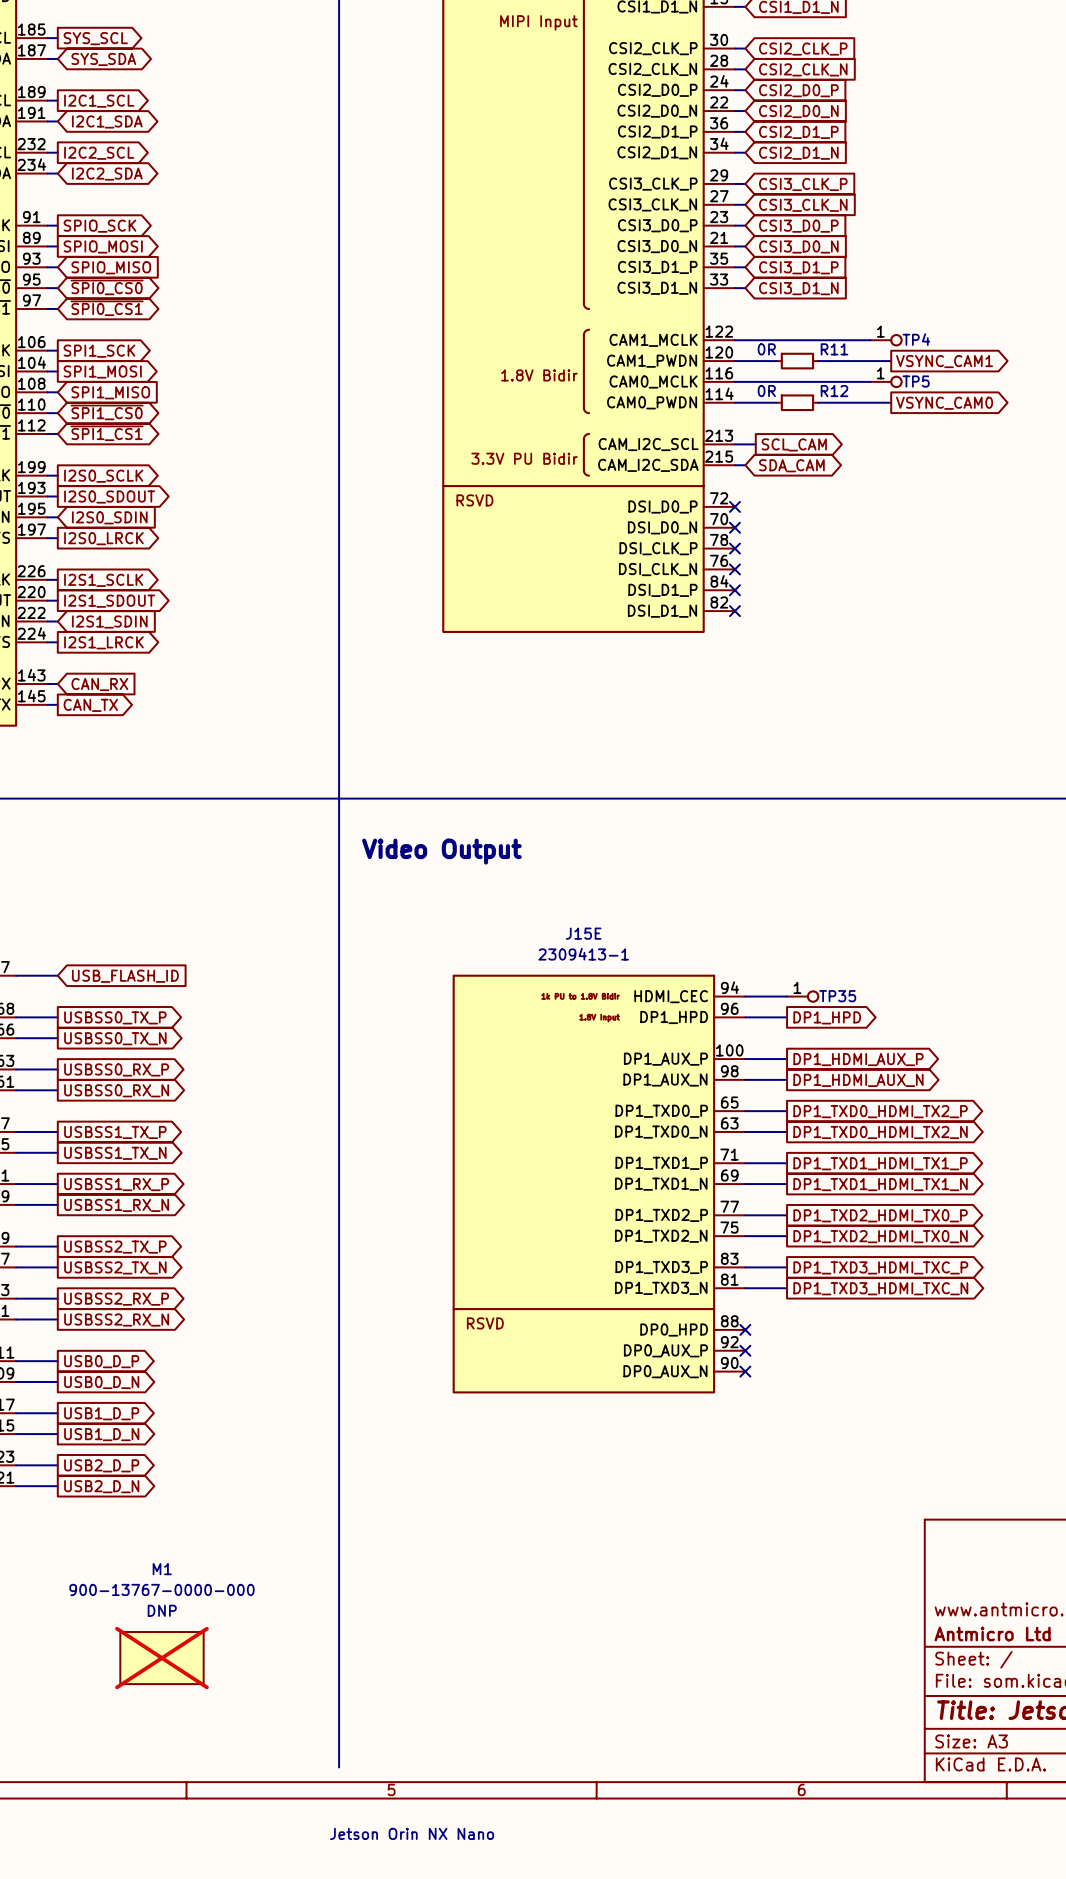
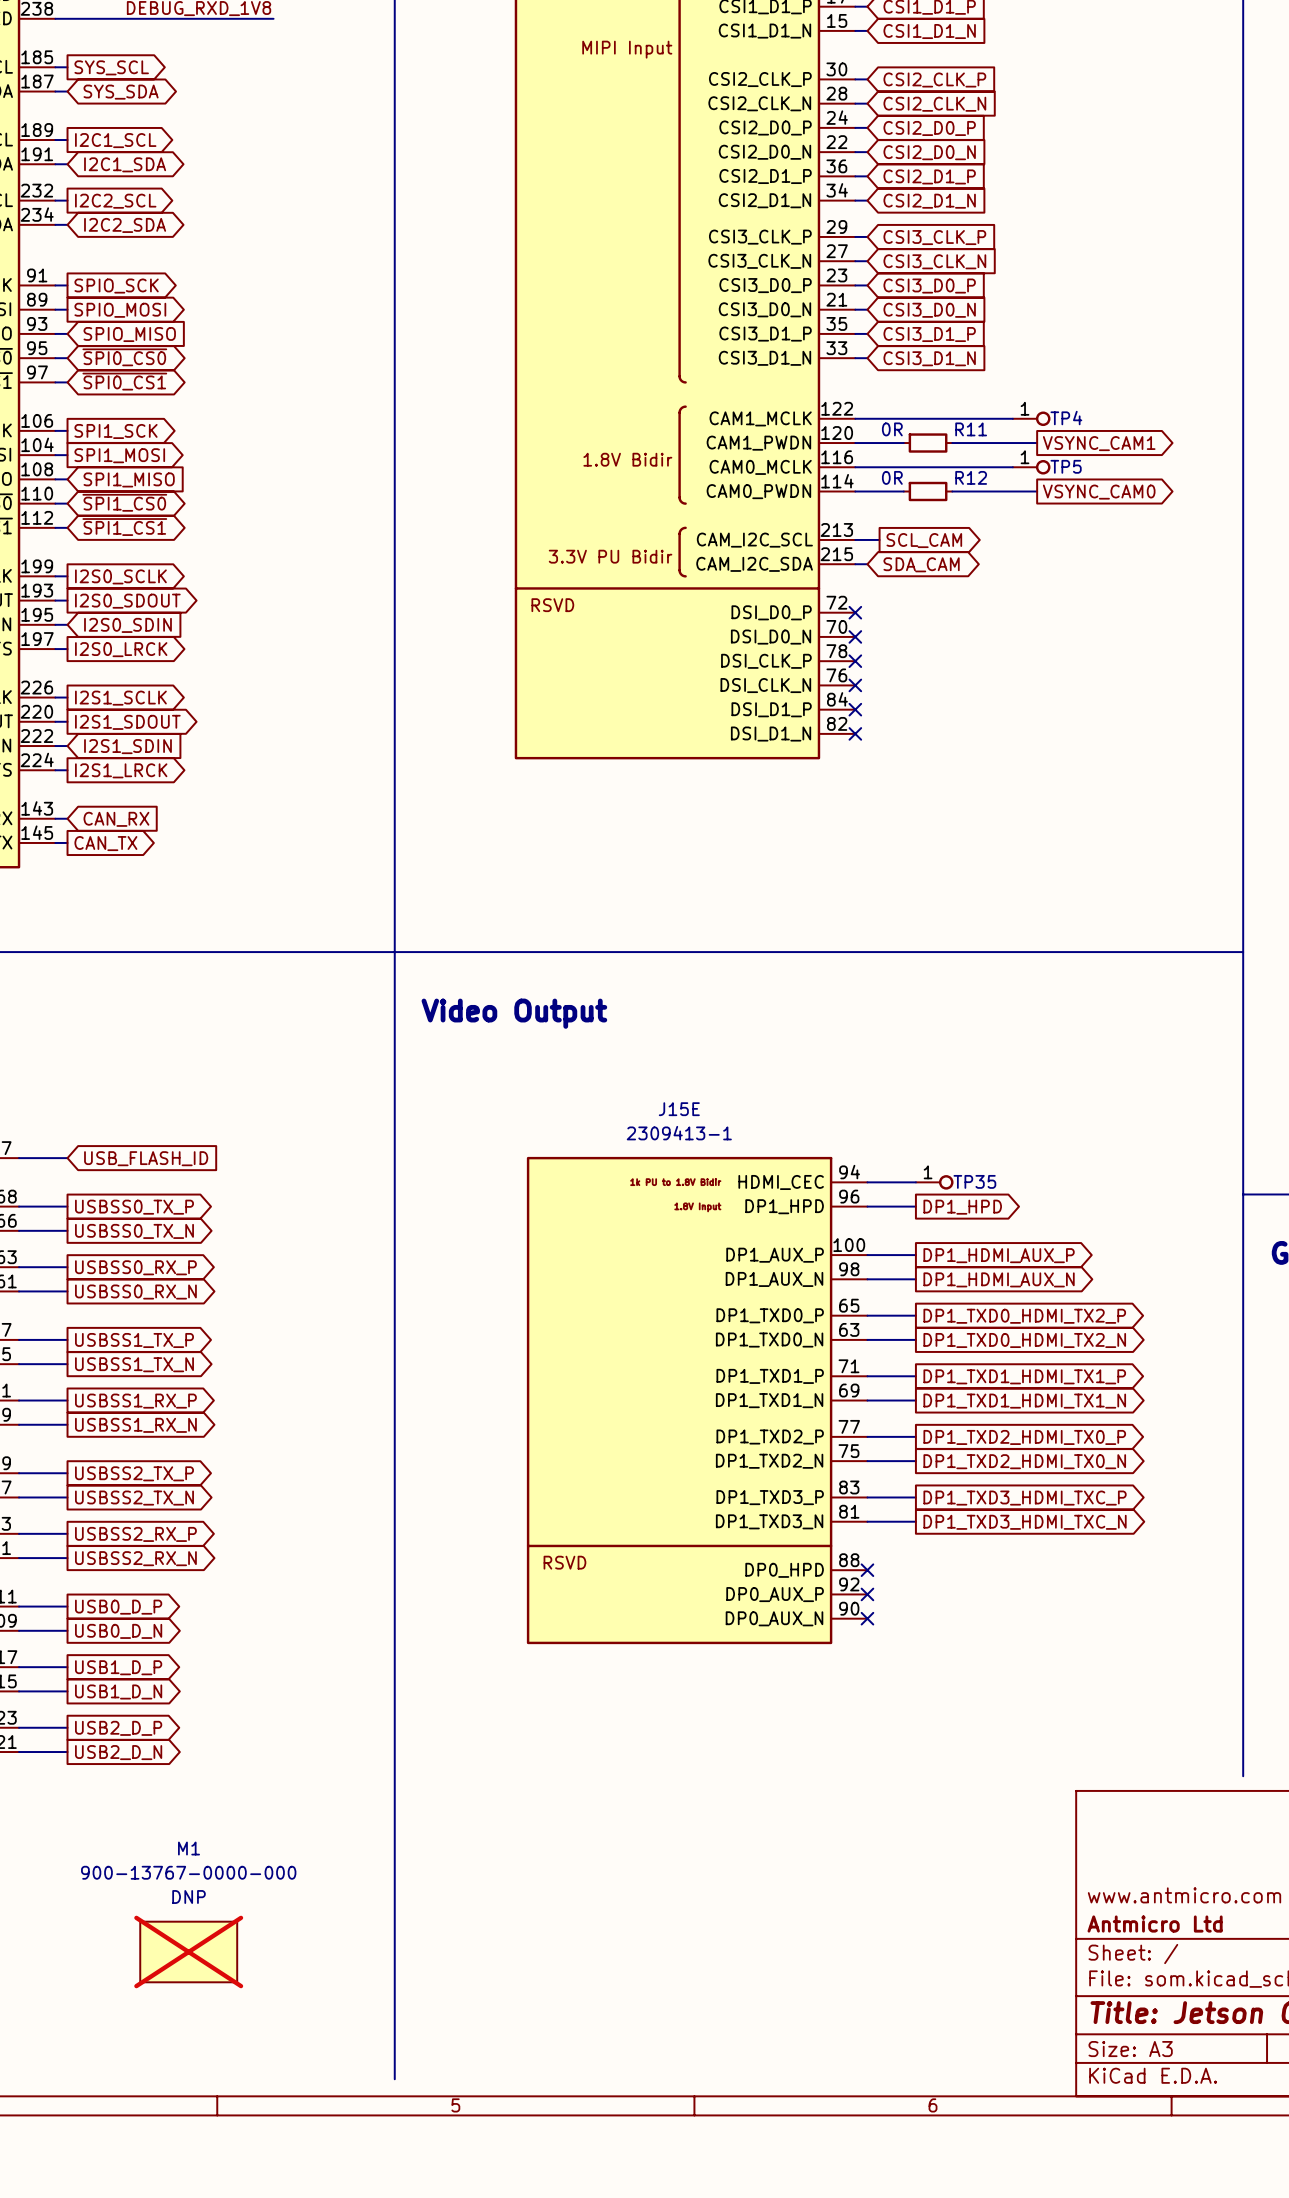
M1 text: Jetson Orin NX Nano (412, 1833) -> none

